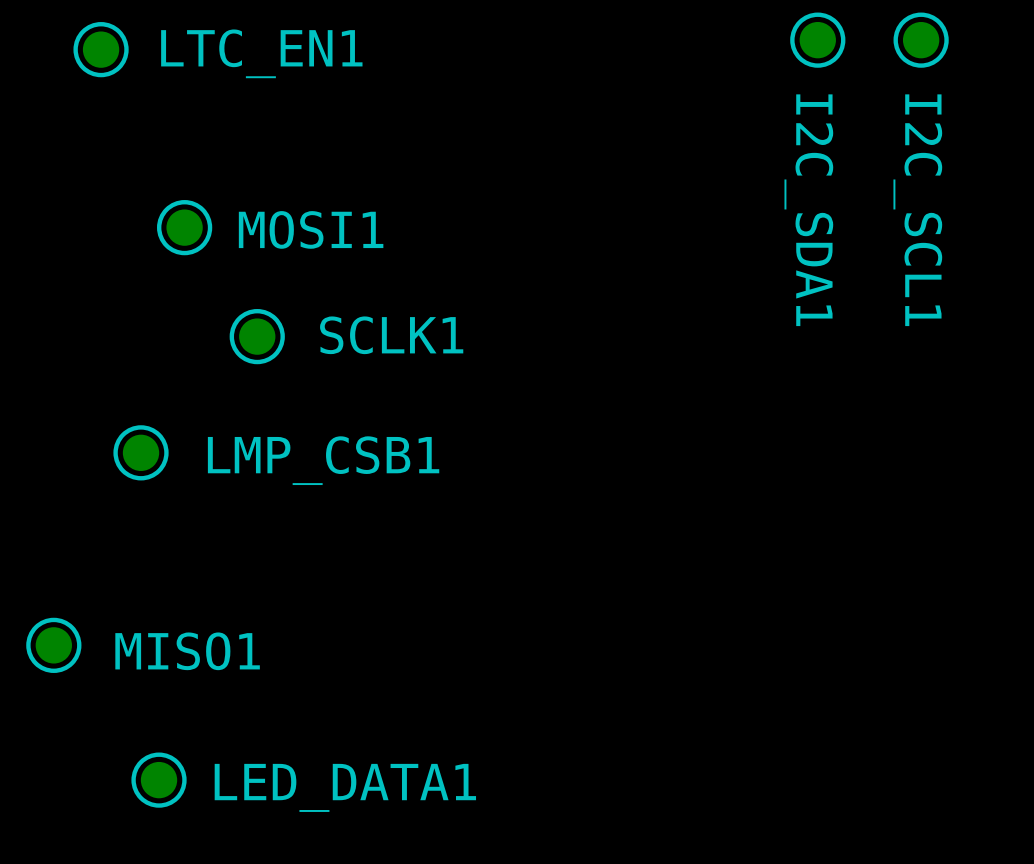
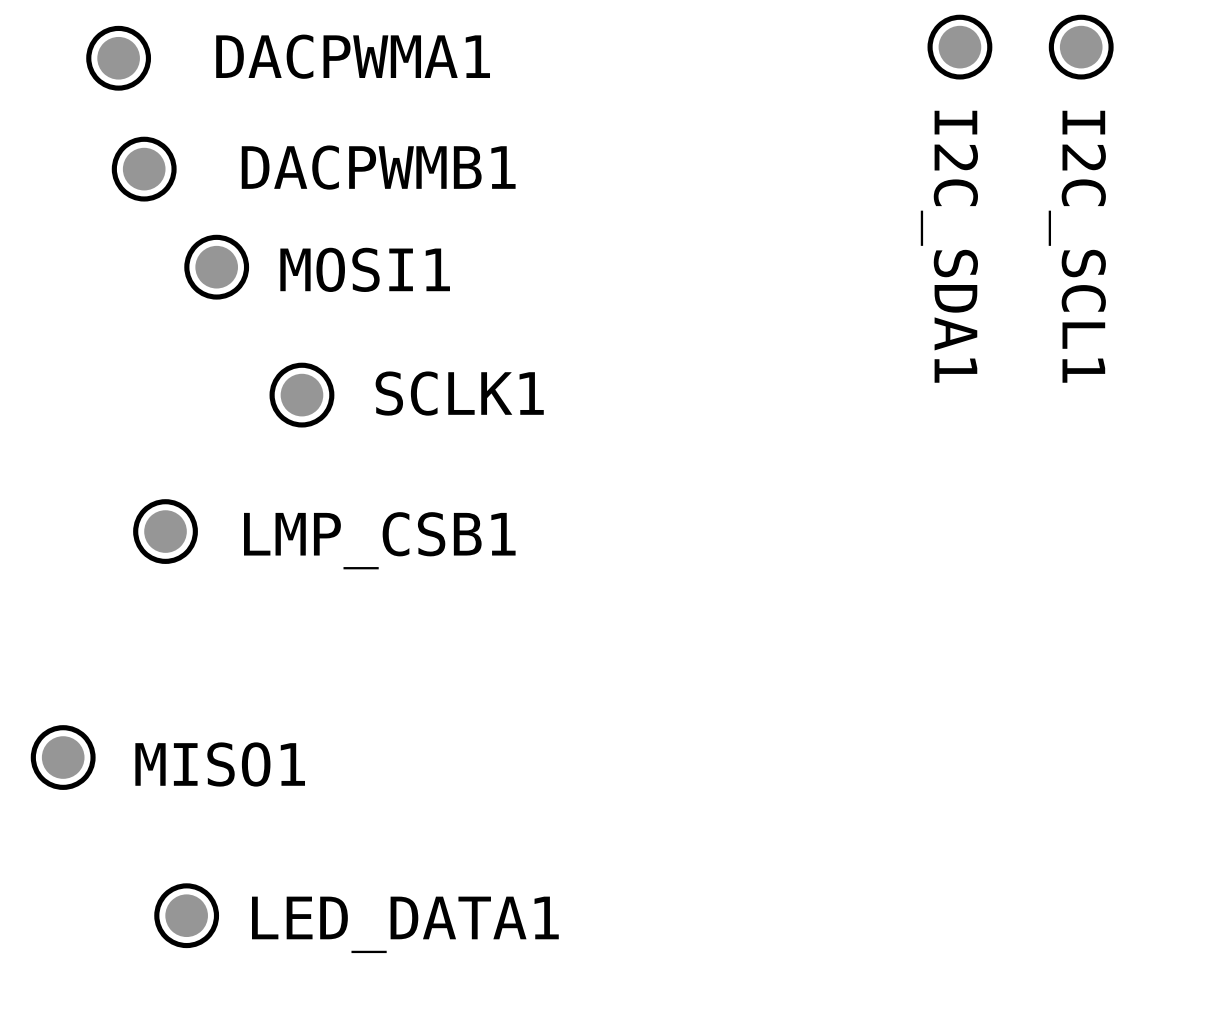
LTC_EN1 name: LTC_EN1 (261, 53) -> DACPWMA1 (353, 56)
DACPWMB1: none -> (144, 169)

